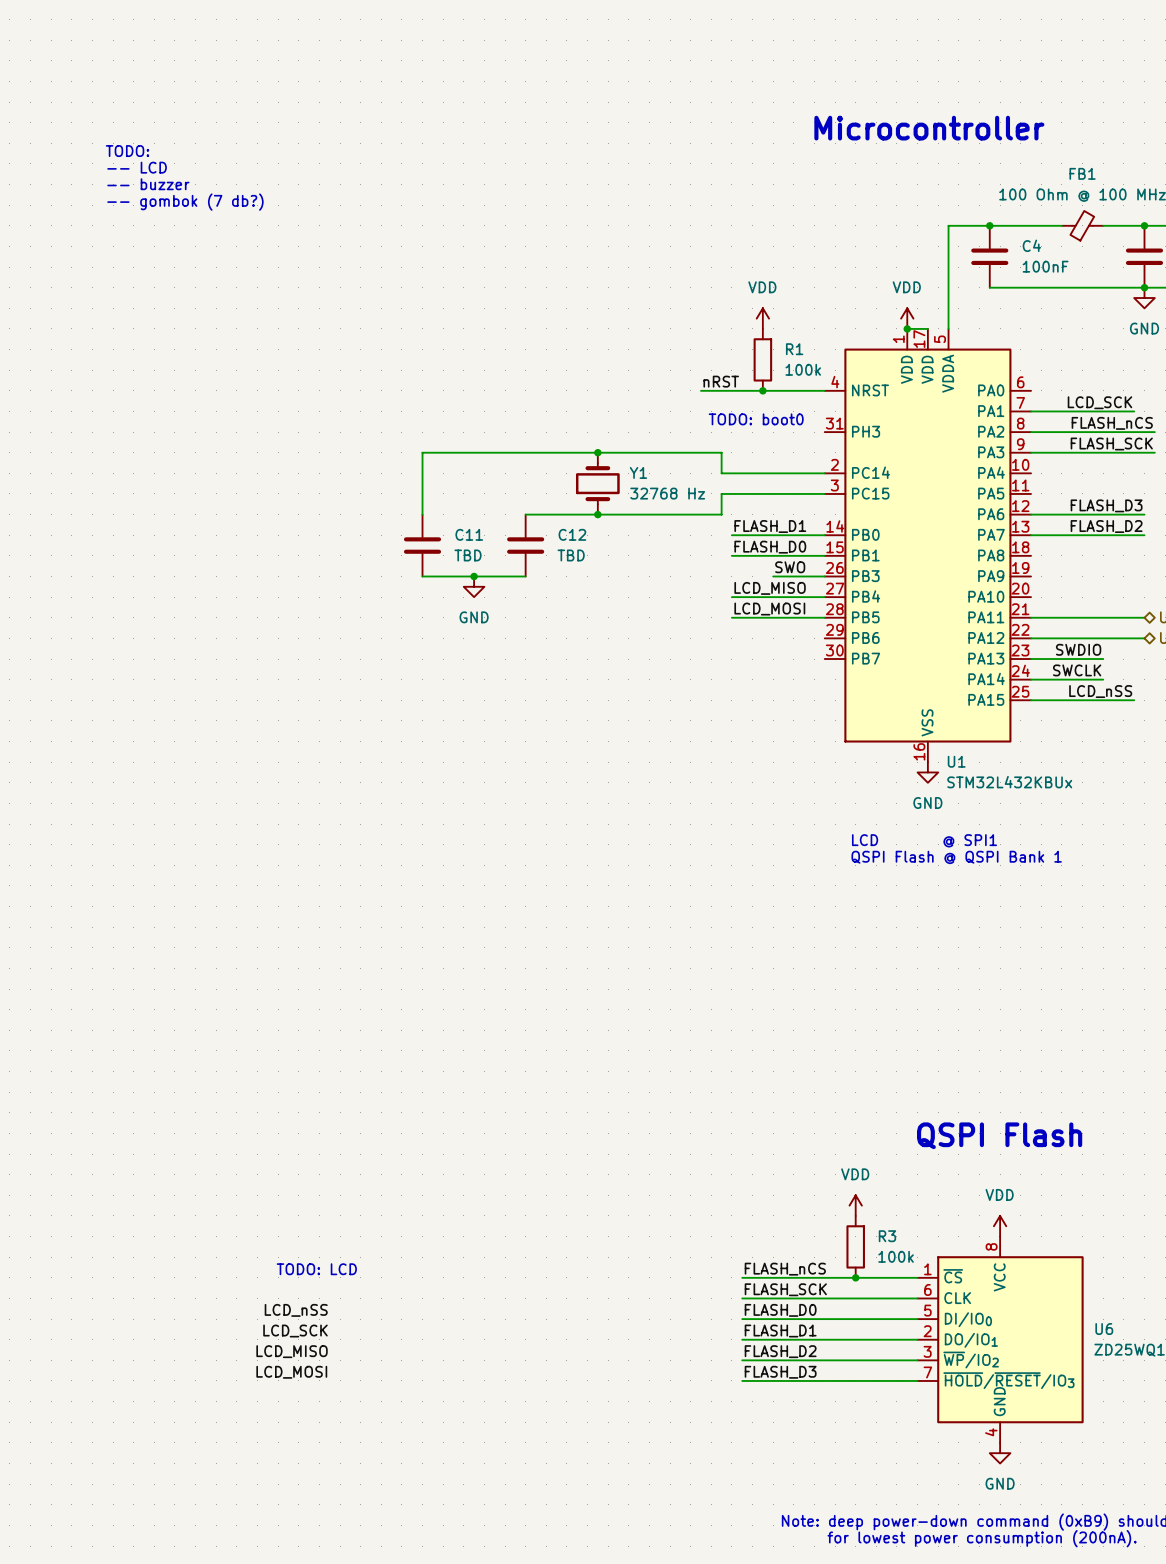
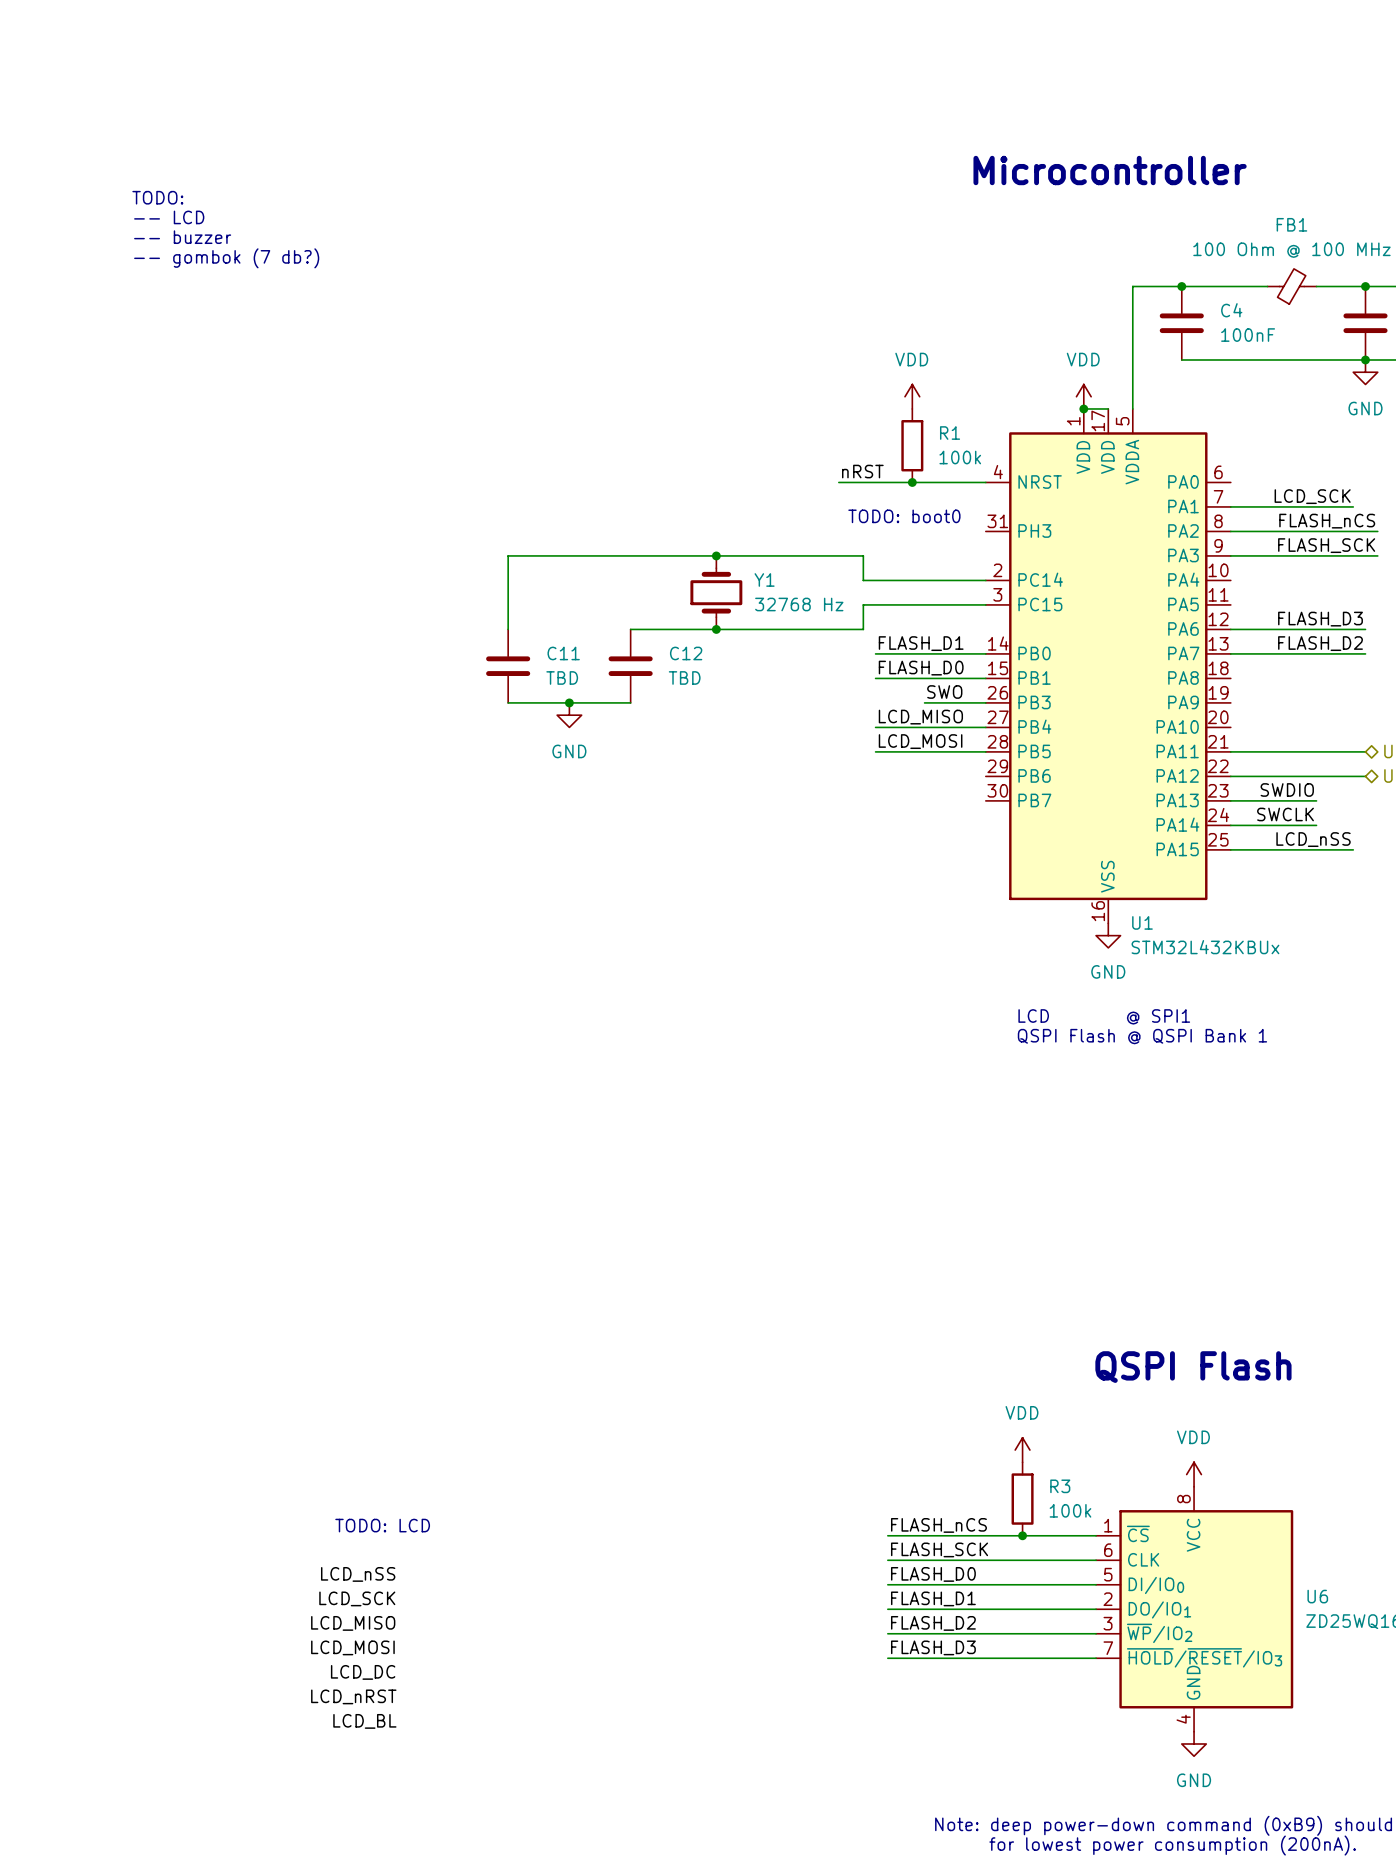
label: none -> LCD_DC (363, 1672)
label: none -> LCD_nRST (353, 1696)
label: none -> LCD_BL (364, 1721)

